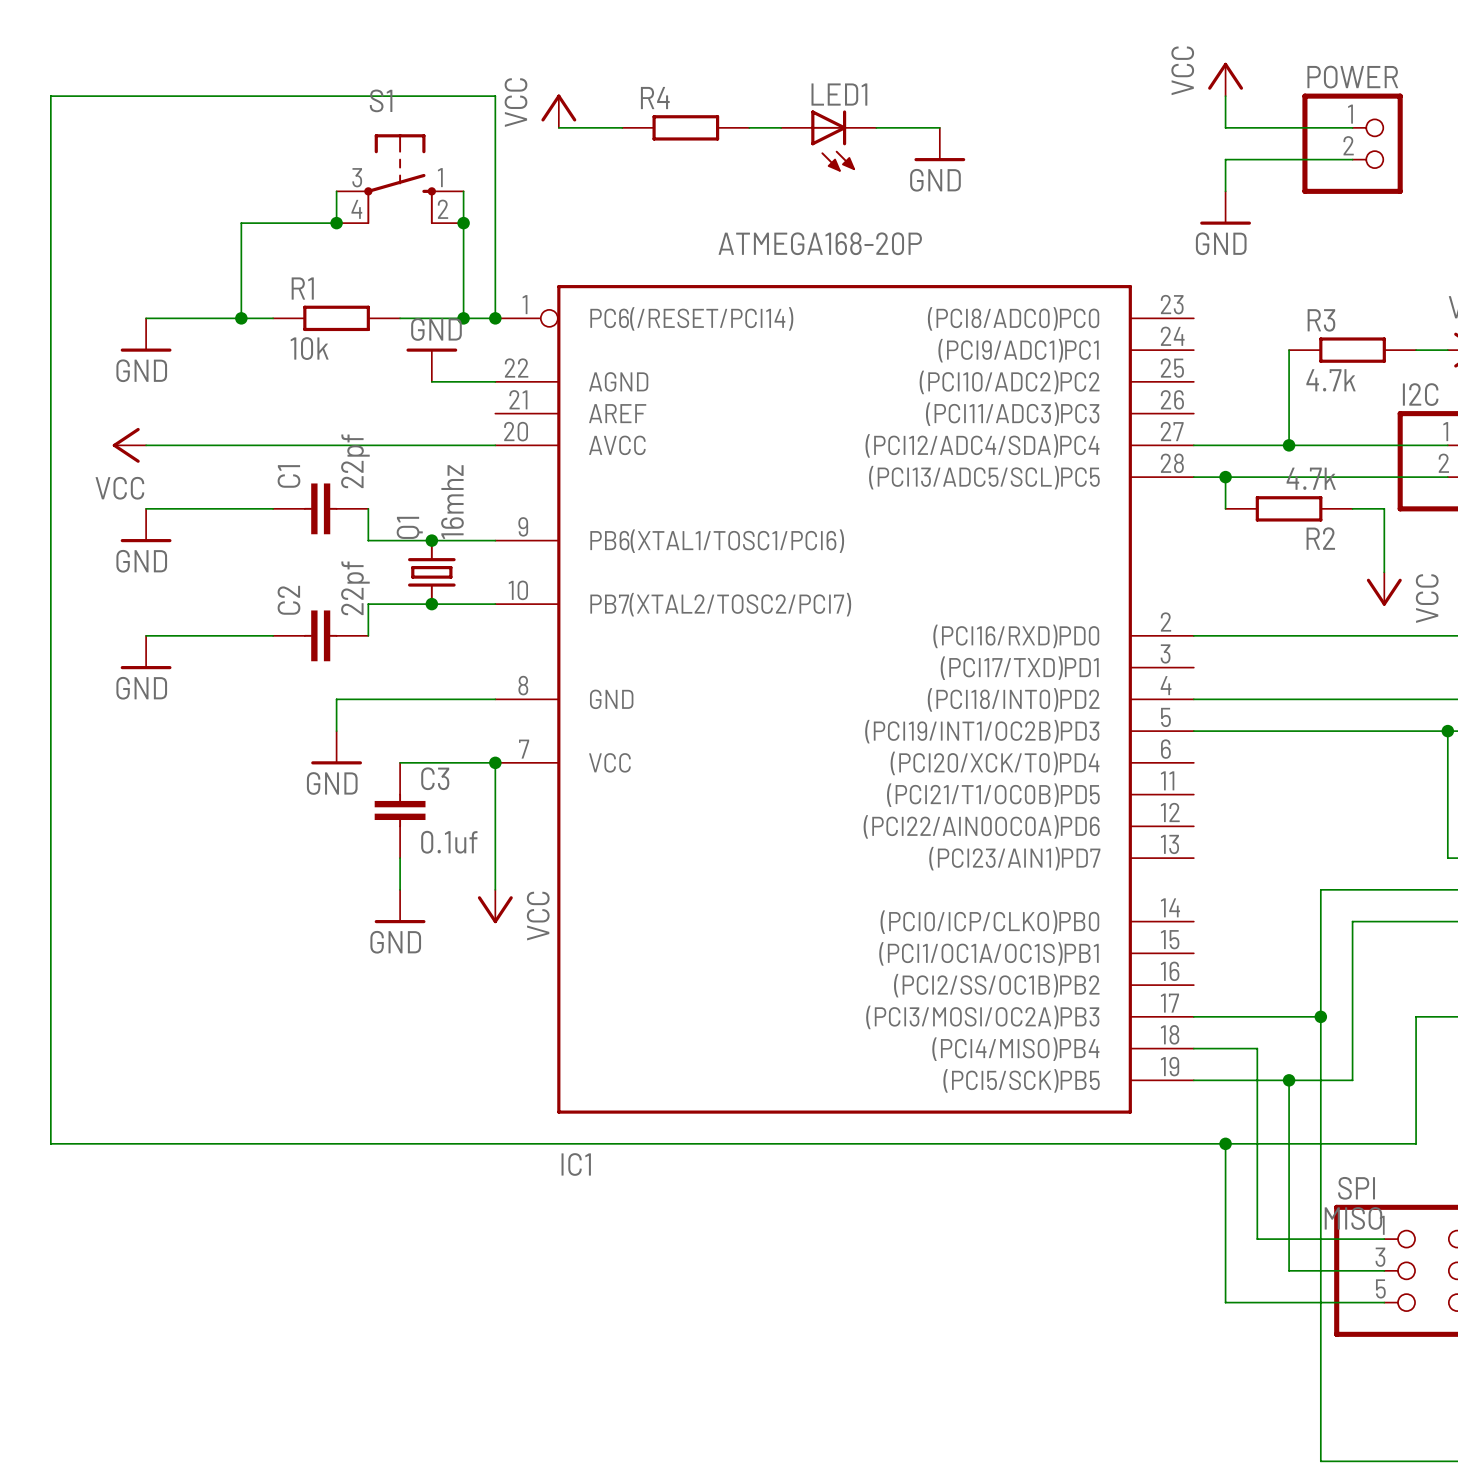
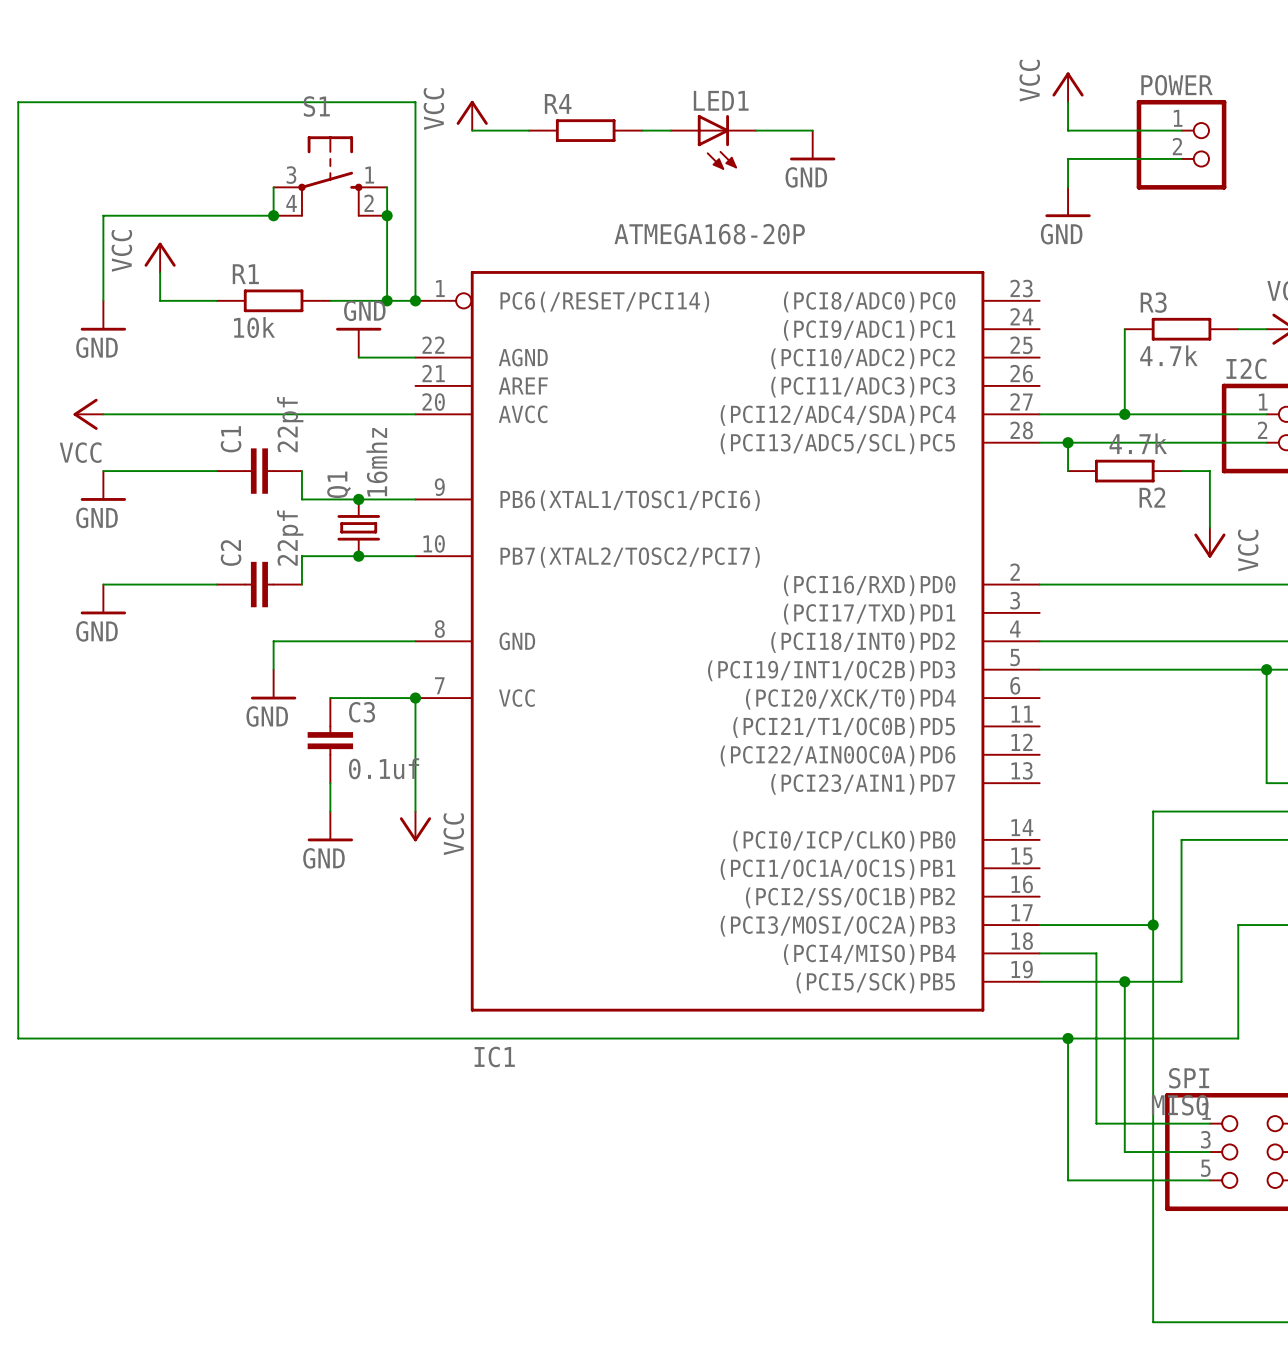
wire: (241, 223) (241, 318) -> (188, 215) (103, 215) (103, 300)
power symbol: none -> VCC (160, 257)
wire: (146, 318) (209, 318) -> (160, 272) (160, 300)
junction: (241, 318) -> none

